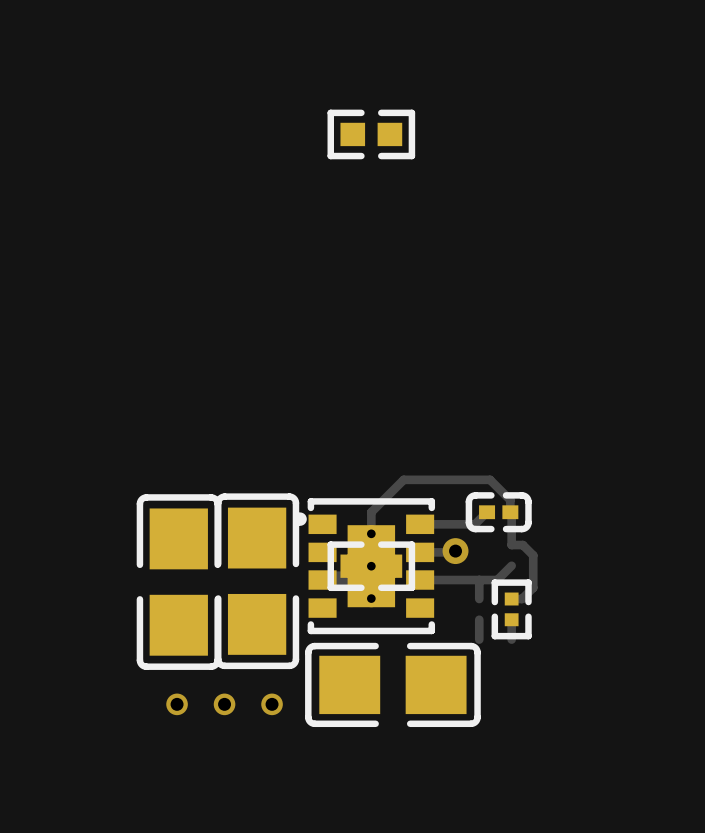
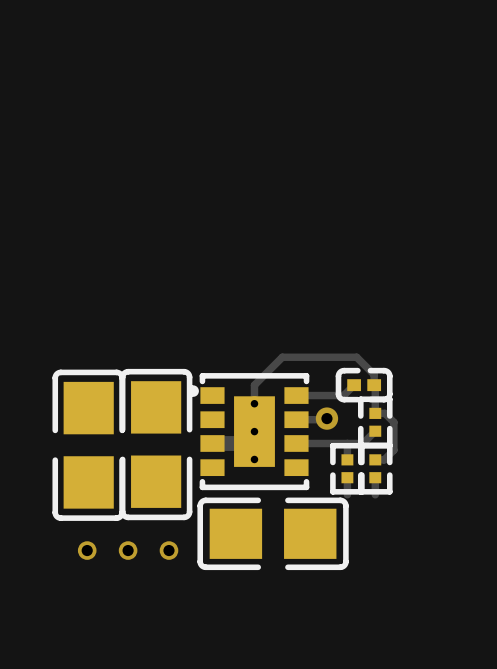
part: (371, 134) -> none
part: none -> (375, 422)
part: (371, 566) -> none
part: none -> (347, 468)

